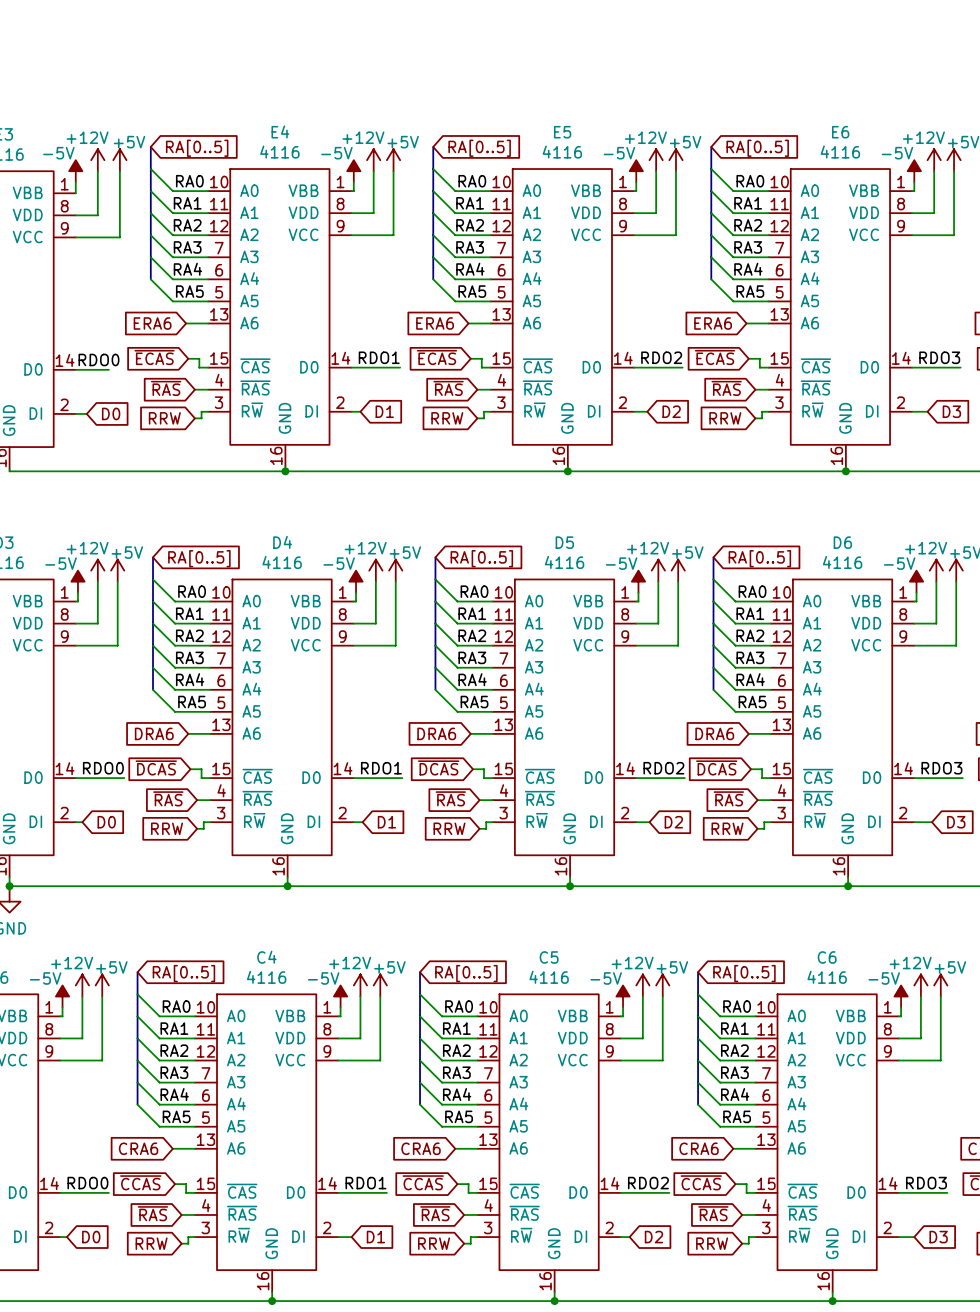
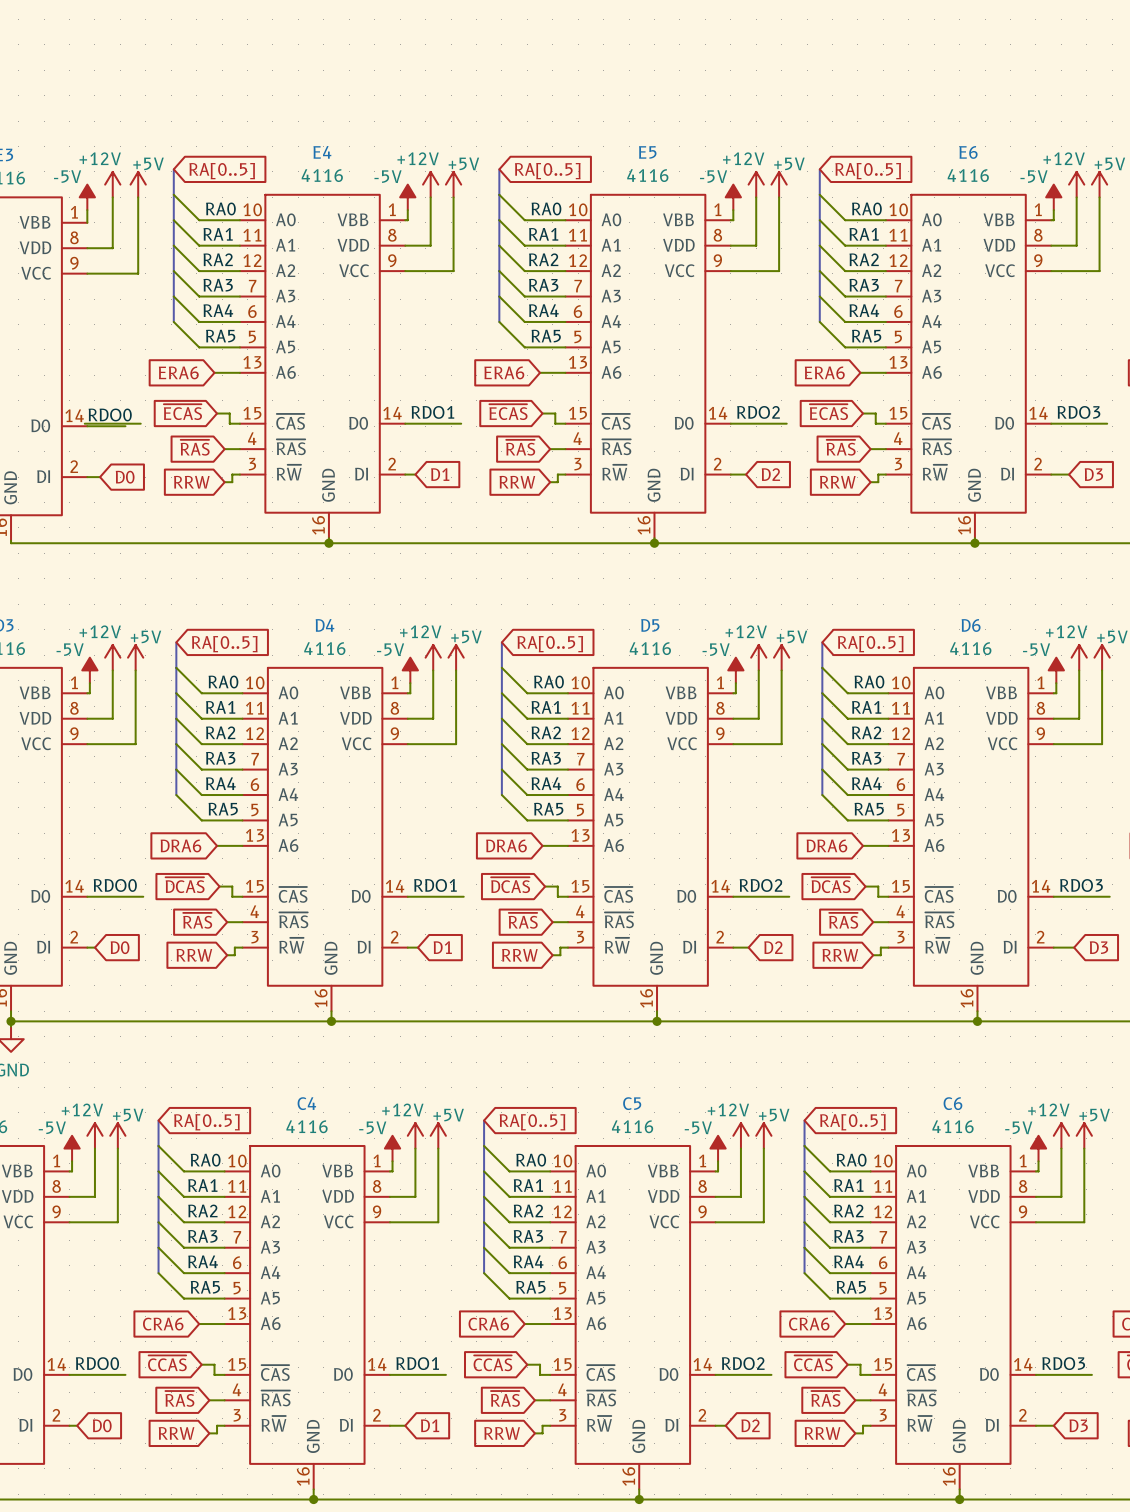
wire: none -> (84, 423) (140, 423)

